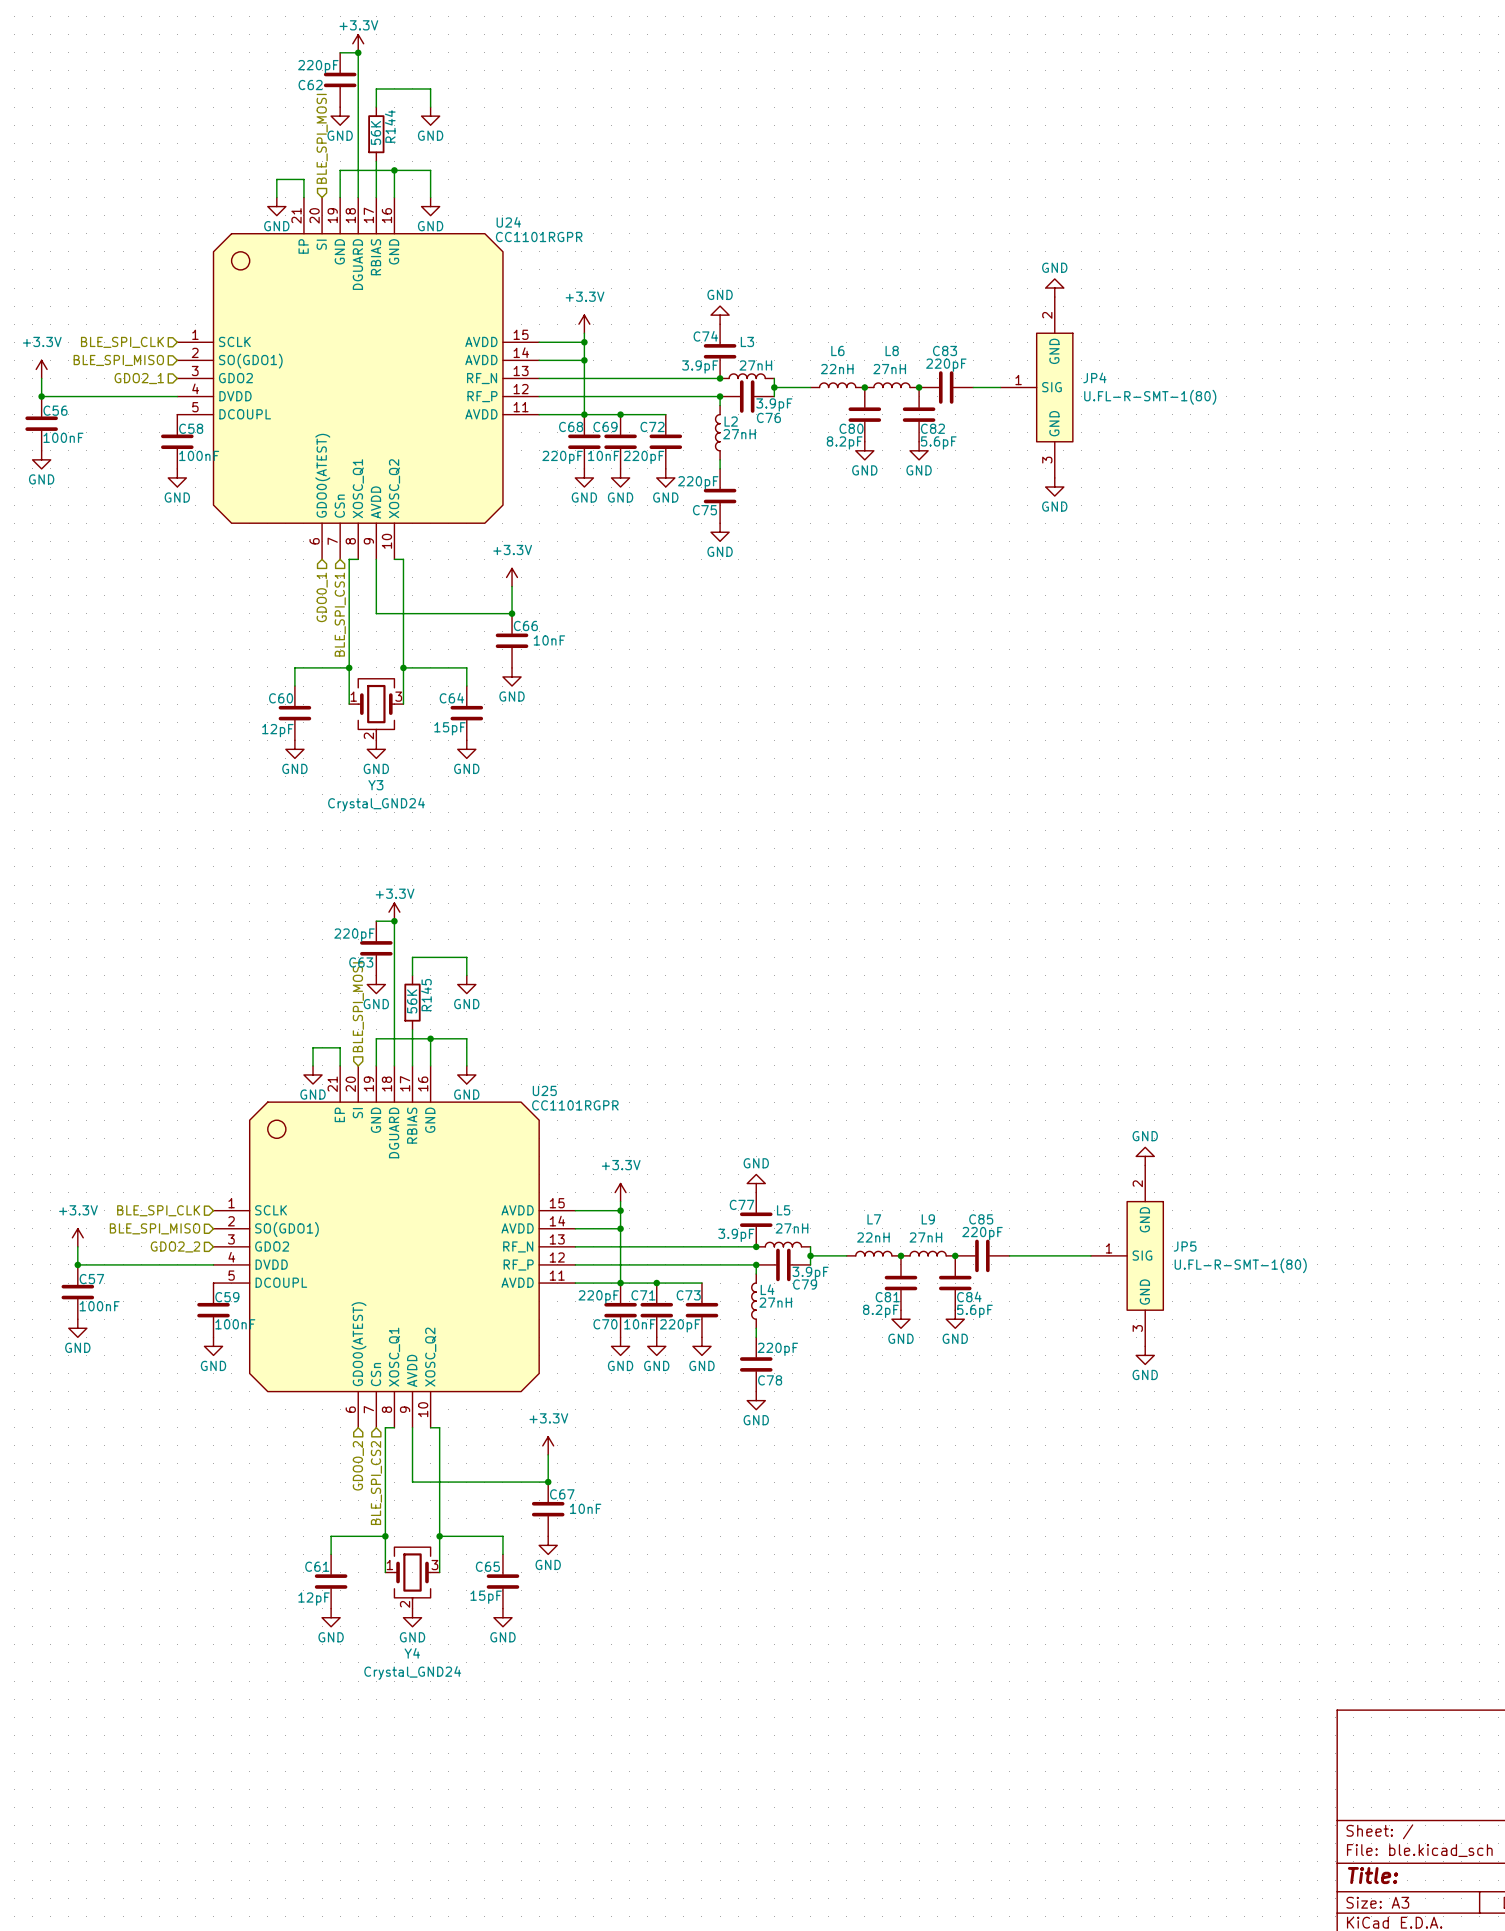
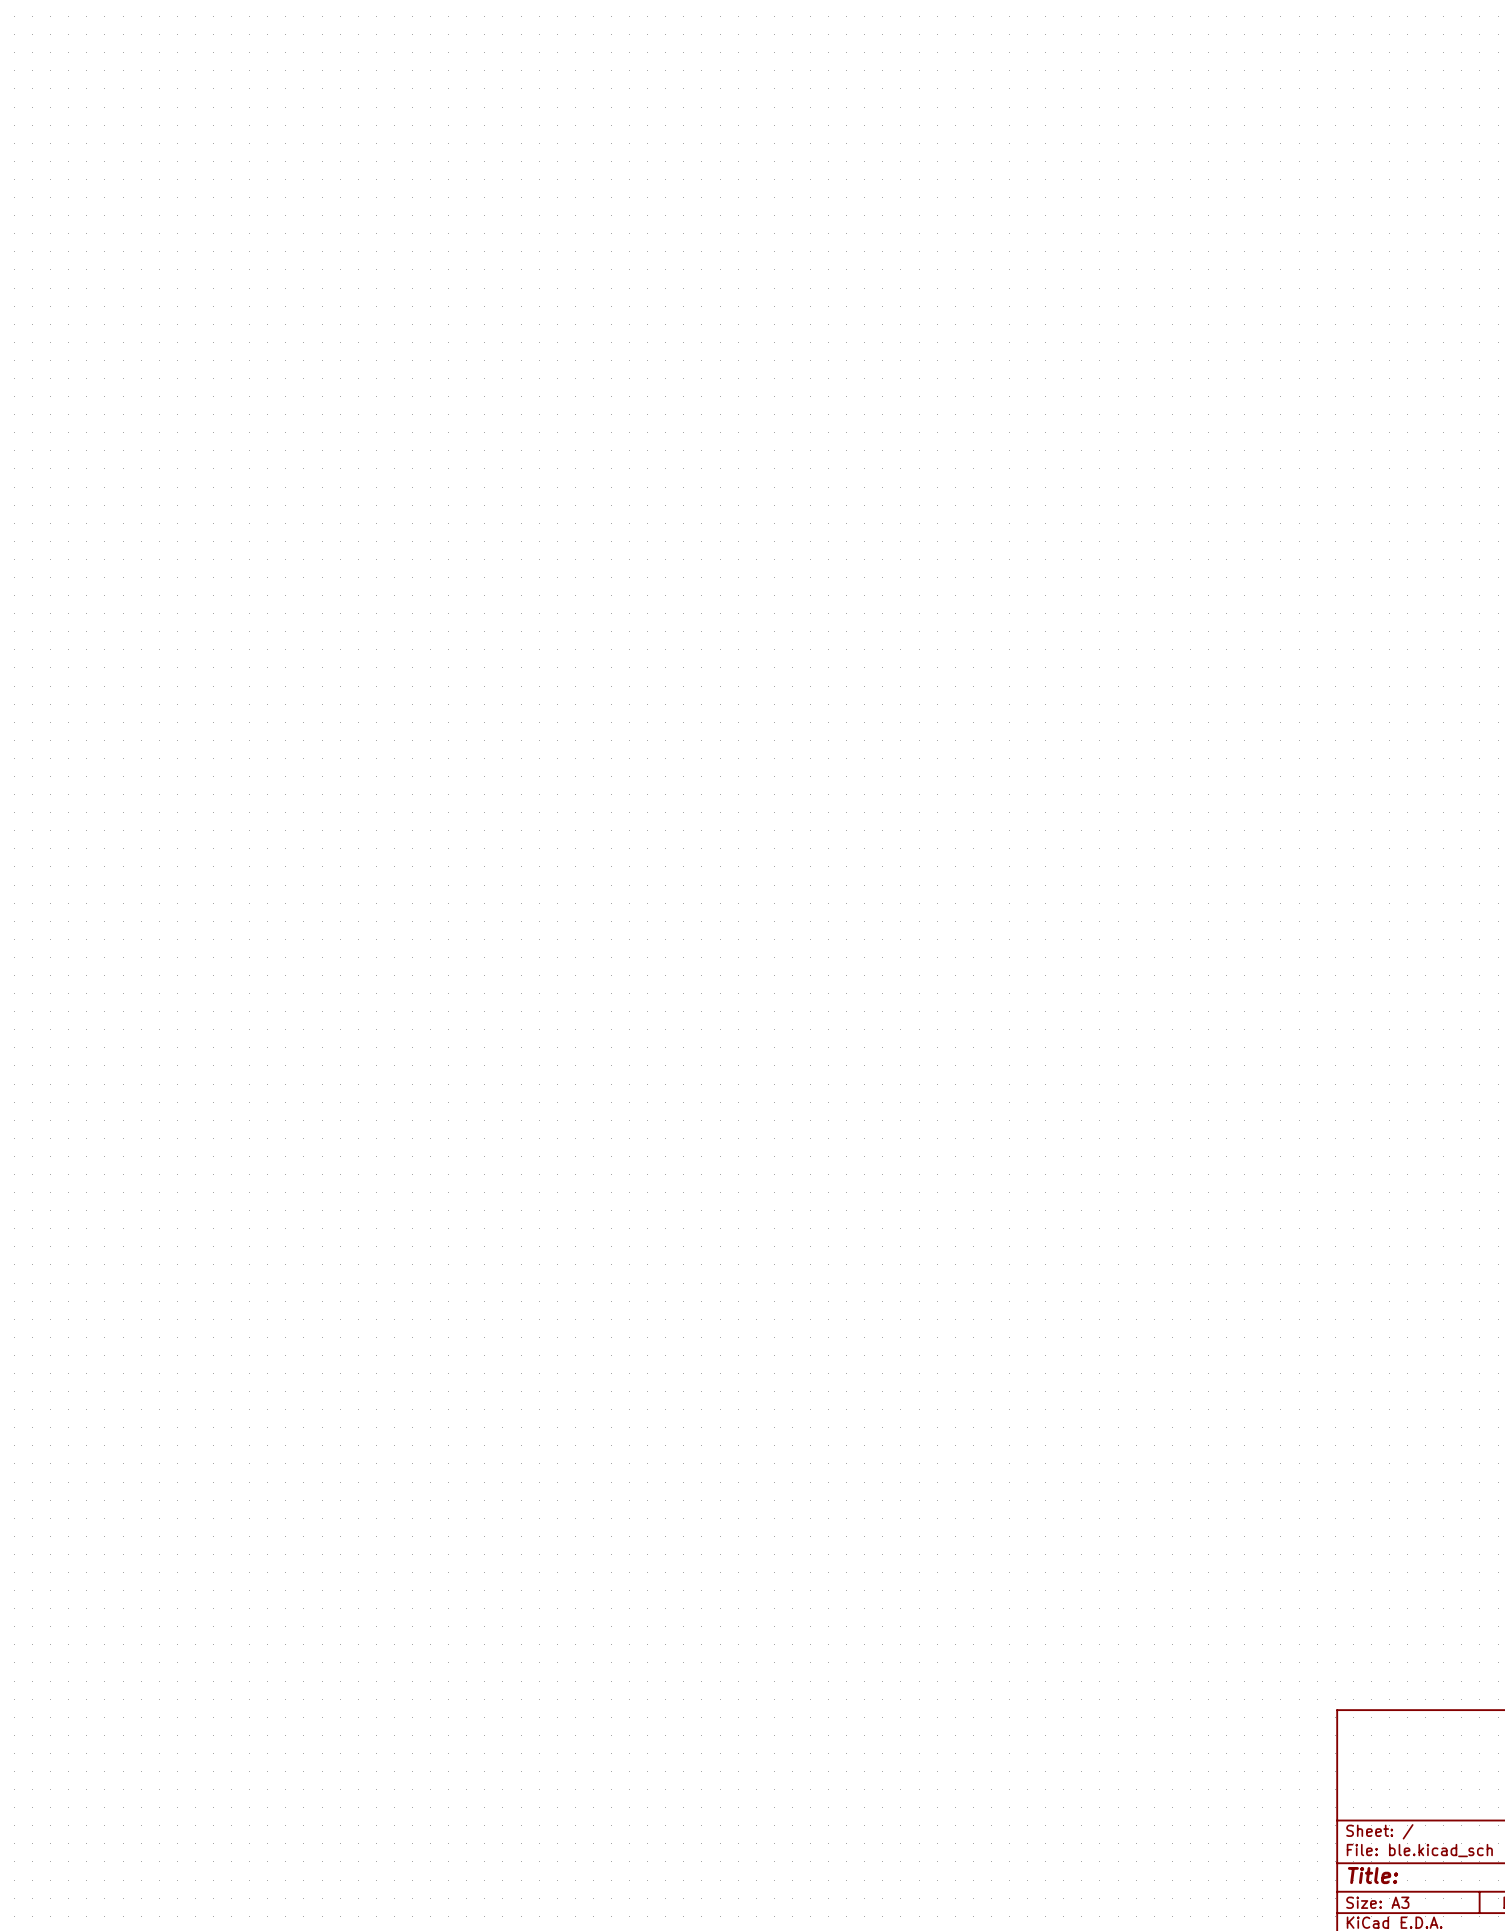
power symbol: +3.3V (358, 43) -> none
wire: (340, 52) (358, 52) (358, 197) -> none
junction: (358, 52) -> none
C62: 220pF (340, 79) -> none
wire: (376, 107) (376, 88) (430, 88) (430, 107) -> none
power symbol: GND (340, 116) -> none
power symbol: GND (430, 116) -> none
R144: 56K (376, 134) -> none
hierarchical label: BLE_SPI_MOSI (322, 138) -> none
wire: (376, 161) (376, 197) -> none
wire: (394, 170) (394, 197) -> none
junction: (394, 170) -> none
wire: (276, 197) (276, 179) (303, 179) (303, 197) -> none
wire: (340, 197) (340, 170) (430, 170) (430, 197) -> none
power symbol: GND (276, 206) -> none
power symbol: GND (430, 206) -> none
power symbol: GND (1054, 288) -> none
power symbol: GND (720, 315) -> none
power symbol: +3.3V (584, 324) -> none
wire: (584, 333) (584, 414) -> none
hierarchical label: BLE_SPI_CLK (122, 342) -> none
wire: (539, 342) (584, 342) -> none
junction: (584, 342) -> none
C74: 3.9pF (720, 351) -> none
hierarchical label: BLE_SPI_MISO (118, 360) -> none
wire: (539, 360) (584, 360) -> none
junction: (584, 360) -> none
power symbol: +3.3V (41, 369) -> none
L3: 27nH (747, 376) -> none
wire: (41, 378) (41, 396) (177, 396) -> none
hierarchical label: GDO2_1 (139, 378) -> none
U24: CC1101RGPR (358, 378) -> none
wire: (539, 378) (720, 378) -> none
junction: (720, 378) -> none
wire: (774, 378) (774, 396) -> none
L6: 22nH (837, 385) -> none
L8: 27nH (891, 385) -> none
wire: (774, 387) (810, 387) -> none
junction: (774, 387) -> none
junction: (864, 387) -> none
junction: (919, 387) -> none
C83: 220pF (946, 387) -> none
wire: (973, 387) (1000, 387) -> none
JP4: U.FL-R-SMT-1(80) (1036, 387) -> none
junction: (41, 396) -> none
wire: (539, 396) (720, 396) (720, 405) -> none
junction: (720, 396) -> none
C76: 3.9pF (747, 396) -> none
wire: (539, 414) (665, 414) -> none
junction: (584, 414) -> none
junction: (620, 414) -> none
C80: 8.2pF (864, 414) -> none
C82: 5.6pF (919, 414) -> none
C56: 100nF (41, 423) -> none
L2: 27nH (717, 432) -> none
C58: 100nF (177, 441) -> none
C68: 220pF (584, 441) -> none
C69: 10nF (620, 441) -> none
C72: 220pF (665, 441) -> none
power symbol: GND (864, 450) -> none
power symbol: GND (919, 450) -> none
power symbol: GND (41, 459) -> none
wire: (720, 459) (720, 468) -> none
power symbol: GND (177, 477) -> none
power symbol: GND (584, 477) -> none
power symbol: GND (620, 477) -> none
power symbol: GND (665, 477) -> none
power symbol: GND (1054, 487) -> none
C75: 220pF (720, 496) -> none
power symbol: GND (720, 532) -> none
wire: (358, 559) (349, 559) (349, 704) -> none
wire: (376, 559) (376, 613) (512, 613) (512, 586) -> none
wire: (394, 559) (403, 559) (403, 704) -> none
power symbol: +3.3V (512, 577) -> none
hierarchical label: GDO0_1 (322, 597) -> none
junction: (512, 613) -> none
hierarchical label: BLE_SPI_CS1 (340, 614) -> none
C66: 10nF (512, 640) -> none
wire: (349, 667) (294, 667) (294, 686) -> none
junction: (349, 667) -> none
wire: (403, 667) (466, 667) (466, 686) -> none
junction: (403, 667) -> none
power symbol: GND (512, 676) -> none
Y3: Crystal_GND24 (376, 709) -> none
C60: 12pF (294, 713) -> none
C64: 15pF (466, 713) -> none
power symbol: GND (294, 749) -> none
power symbol: GND (376, 749) -> none
power symbol: GND (466, 749) -> none
power symbol: +3.3V (394, 912) -> none
wire: (376, 921) (394, 921) (394, 1065) -> none
junction: (394, 921) -> none
C63: 220pF (376, 948) -> none
wire: (412, 975) (412, 957) (466, 957) (466, 975) -> none
power symbol: GND (376, 984) -> none
power symbol: GND (466, 984) -> none
R145: 56K (412, 1002) -> none
hierarchical label: BLE_SPI_MOSI (358, 1007) -> none
wire: (412, 1029) (412, 1065) -> none
wire: (430, 1038) (430, 1065) -> none
junction: (430, 1038) -> none
wire: (313, 1065) (313, 1047) (340, 1047) (340, 1065) -> none
wire: (376, 1065) (376, 1038) (466, 1038) (466, 1065) -> none
power symbol: GND (313, 1074) -> none
power symbol: GND (466, 1074) -> none
power symbol: GND (1145, 1156) -> none
power symbol: GND (756, 1183) -> none
power symbol: +3.3V (620, 1192) -> none
wire: (620, 1201) (620, 1283) -> none
hierarchical label: BLE_SPI_CLK (158, 1210) -> none
wire: (575, 1210) (620, 1210) -> none
junction: (620, 1210) -> none
C77: 3.9pF (756, 1219) -> none
hierarchical label: BLE_SPI_MISO (155, 1228) -> none
wire: (575, 1228) (620, 1228) -> none
junction: (620, 1228) -> none
power symbol: +3.3V (77, 1237) -> none
L5: 27nH (783, 1244) -> none
wire: (77, 1246) (77, 1264) (213, 1264) -> none
hierarchical label: GDO2_2 (175, 1246) -> none
U25: CC1101RGPR (394, 1246) -> none
wire: (575, 1246) (756, 1246) -> none
junction: (756, 1246) -> none
wire: (810, 1246) (810, 1264) -> none
L7: 22nH (873, 1253) -> none
L9: 27nH (928, 1253) -> none
wire: (810, 1255) (846, 1255) -> none
junction: (810, 1255) -> none
junction: (900, 1255) -> none
junction: (955, 1255) -> none
C85: 220pF (982, 1255) -> none
wire: (1009, 1255) (1090, 1255) -> none
JP5: U.FL-R-SMT-1(80) (1127, 1255) -> none
junction: (77, 1264) -> none
wire: (575, 1264) (756, 1264) (756, 1273) -> none
junction: (756, 1264) -> none
C79: 3.9pF (783, 1264) -> none
wire: (575, 1283) (701, 1283) -> none
junction: (620, 1283) -> none
junction: (656, 1283) -> none
C81: 8.2pF (900, 1283) -> none
C84: 5.6pF (955, 1283) -> none
C57: 100nF (77, 1292) -> none
L4: 27nH (754, 1301) -> none
C59: 100nF (213, 1310) -> none
C70: 220pF (620, 1310) -> none
C71: 10nF (656, 1310) -> none
C73: 220pF (701, 1310) -> none
power symbol: GND (900, 1319) -> none
power symbol: GND (955, 1319) -> none
power symbol: GND (77, 1328) -> none
wire: (756, 1328) (756, 1337) -> none
power symbol: GND (213, 1346) -> none
power symbol: GND (620, 1346) -> none
power symbol: GND (656, 1346) -> none
power symbol: GND (701, 1346) -> none
power symbol: GND (1145, 1355) -> none
C78: 220pF (756, 1364) -> none
power symbol: GND (756, 1400) -> none
wire: (394, 1427) (385, 1427) (385, 1572) -> none
wire: (412, 1427) (412, 1482) (548, 1482) (548, 1454) -> none
wire: (430, 1427) (439, 1427) (439, 1572) -> none
power symbol: +3.3V (548, 1445) -> none
hierarchical label: GDO0_2 (358, 1465) -> none
junction: (548, 1482) -> none
hierarchical label: BLE_SPI_CS2 (376, 1483) -> none
C67: 10nF (548, 1509) -> none
wire: (385, 1536) (331, 1536) (331, 1554) -> none
junction: (385, 1536) -> none
wire: (439, 1536) (502, 1536) (502, 1554) -> none
junction: (439, 1536) -> none
power symbol: GND (548, 1545) -> none
Y4: Crystal_GND24 (412, 1577) -> none
C61: 12pF (331, 1581) -> none
C65: 15pF (502, 1581) -> none
power symbol: GND (331, 1617) -> none
power symbol: GND (412, 1617) -> none
power symbol: GND (502, 1617) -> none

